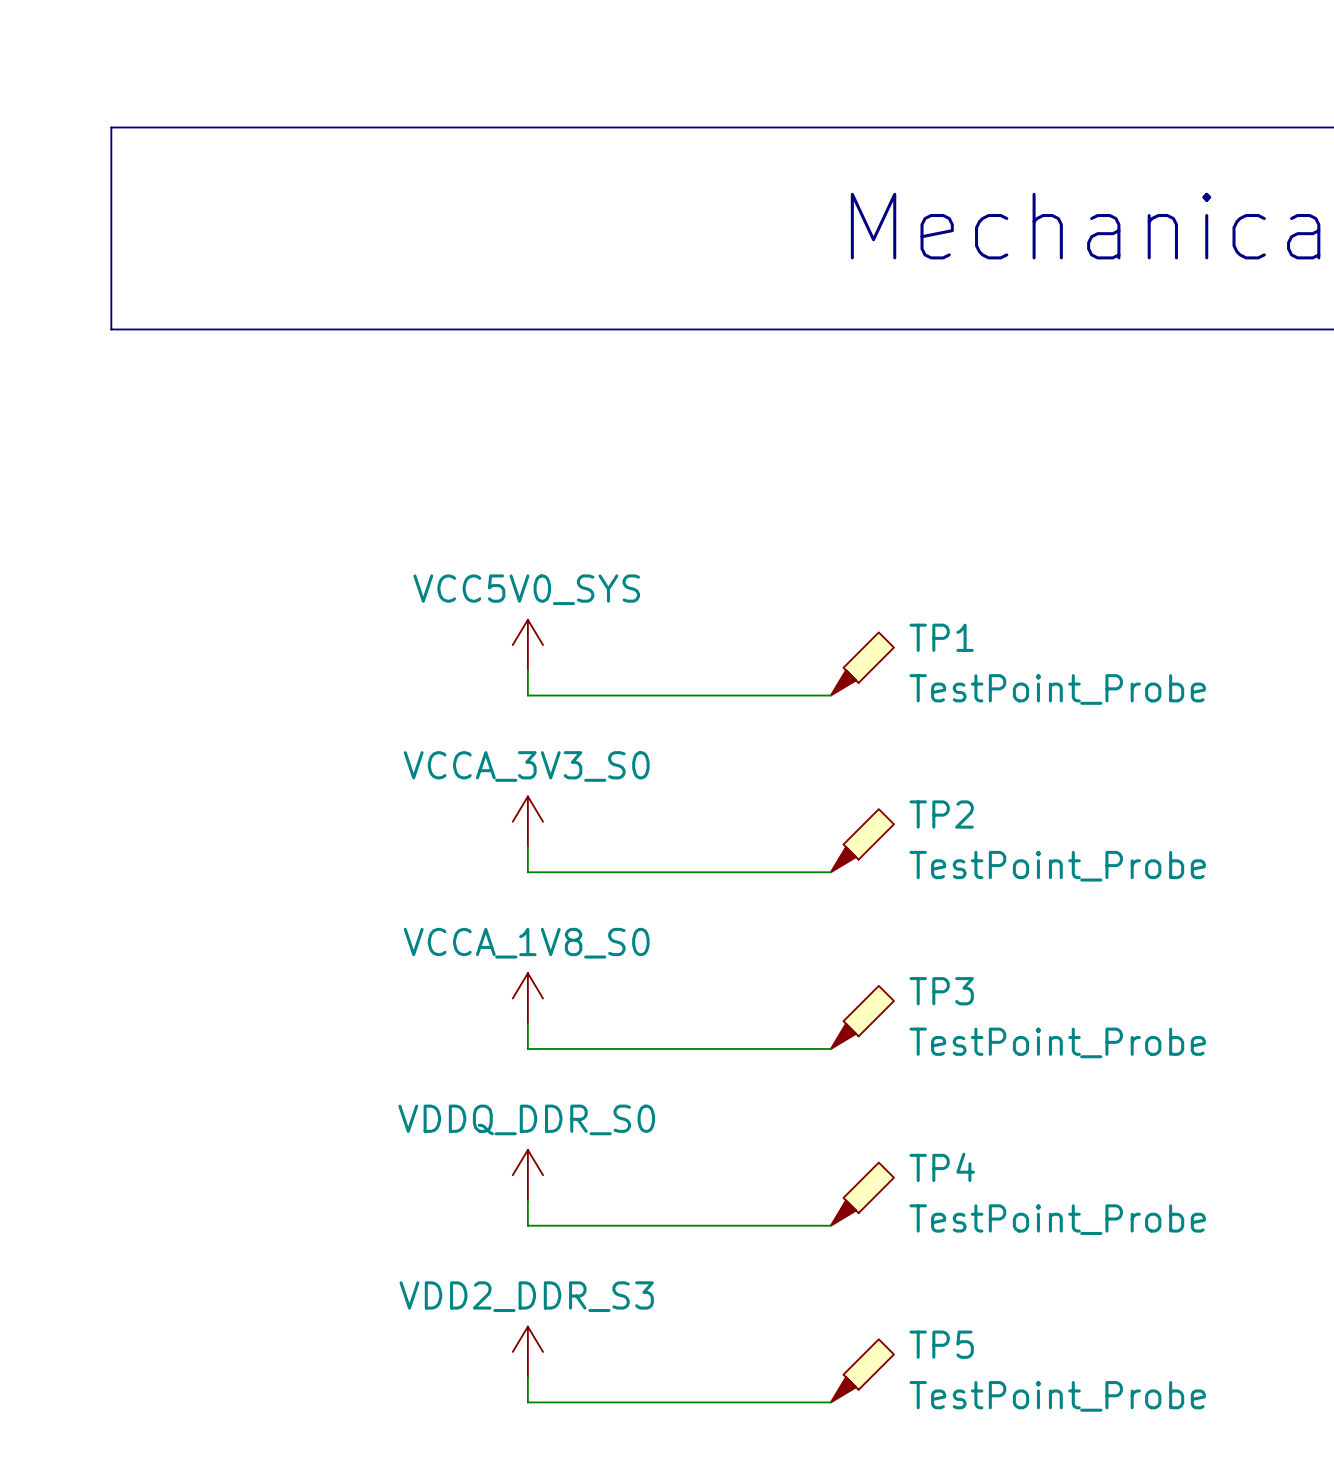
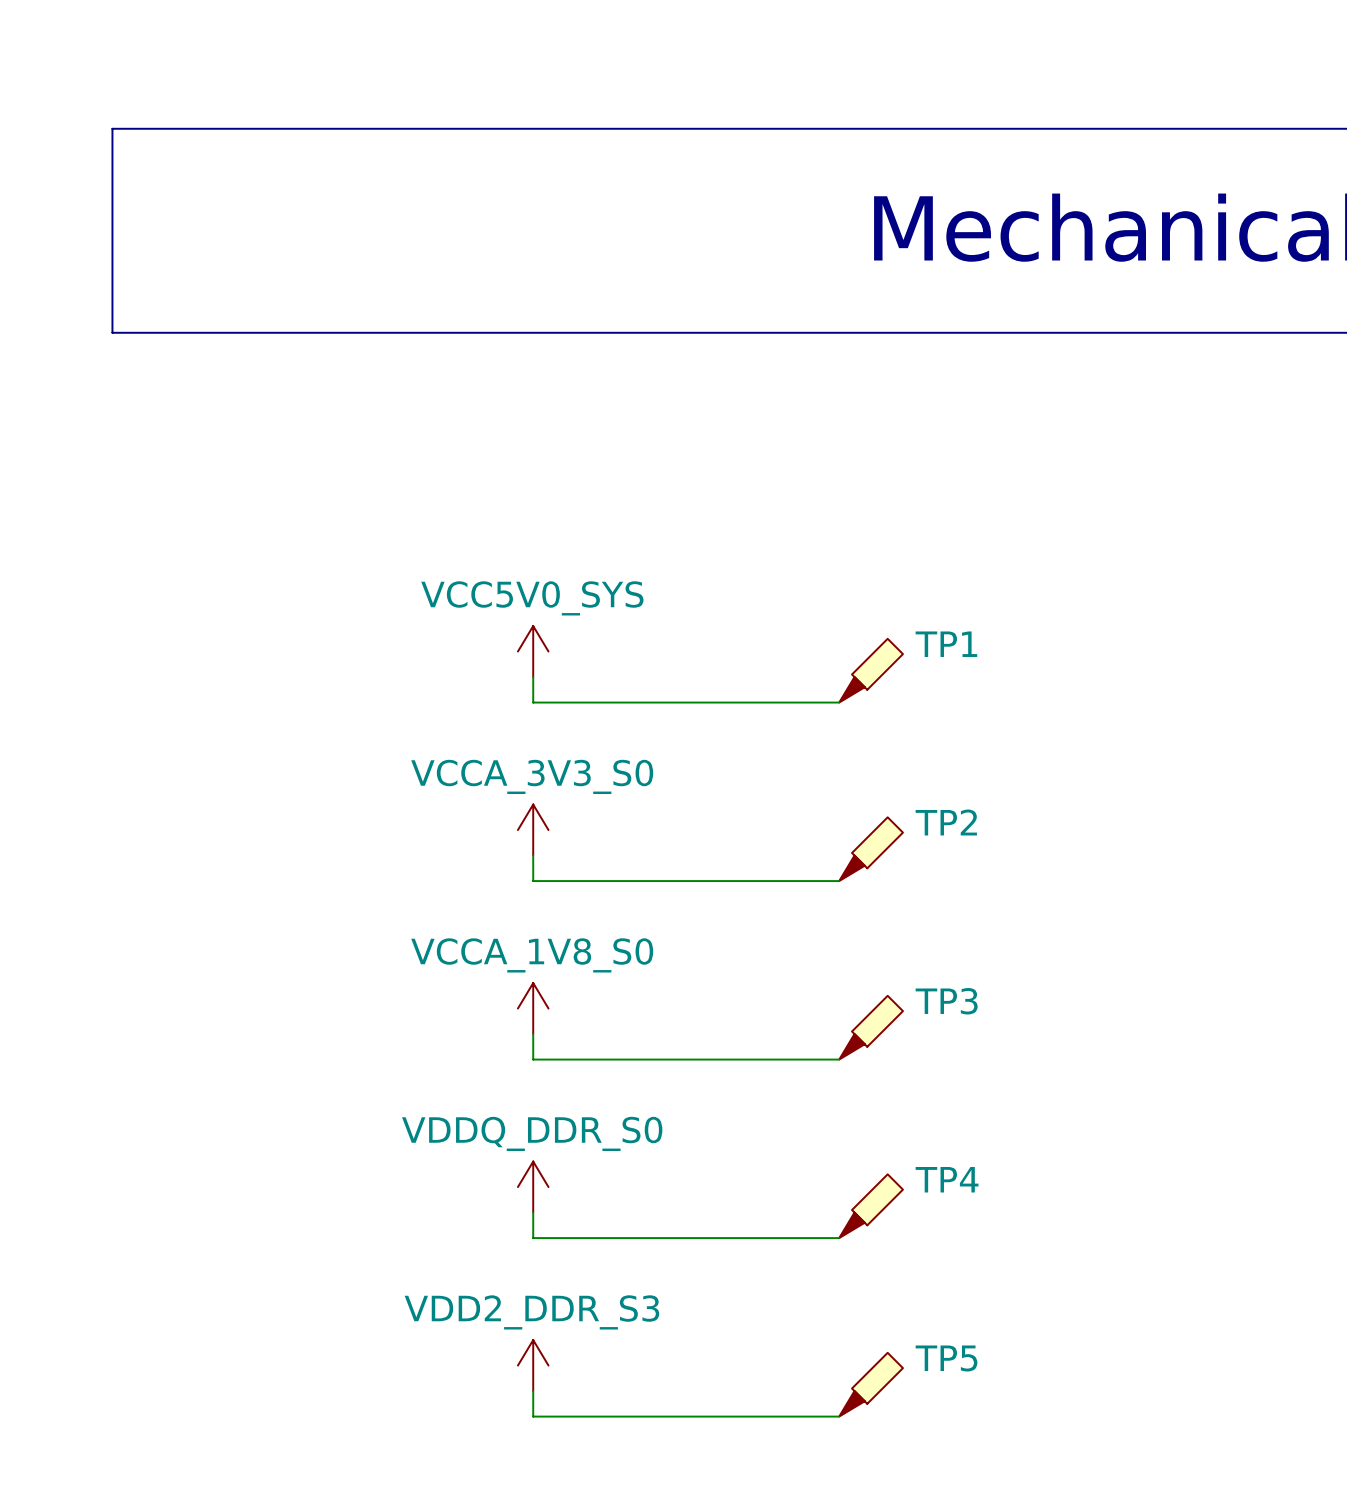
TP1 value: TestPoint_Probe (1057, 689) -> none
TP2 value: TestPoint_Probe (1057, 866) -> none
TP3 value: TestPoint_Probe (1057, 1042) -> none
TP4 value: TestPoint_Probe (1057, 1219) -> none
TP5 value: TestPoint_Probe (1057, 1396) -> none

